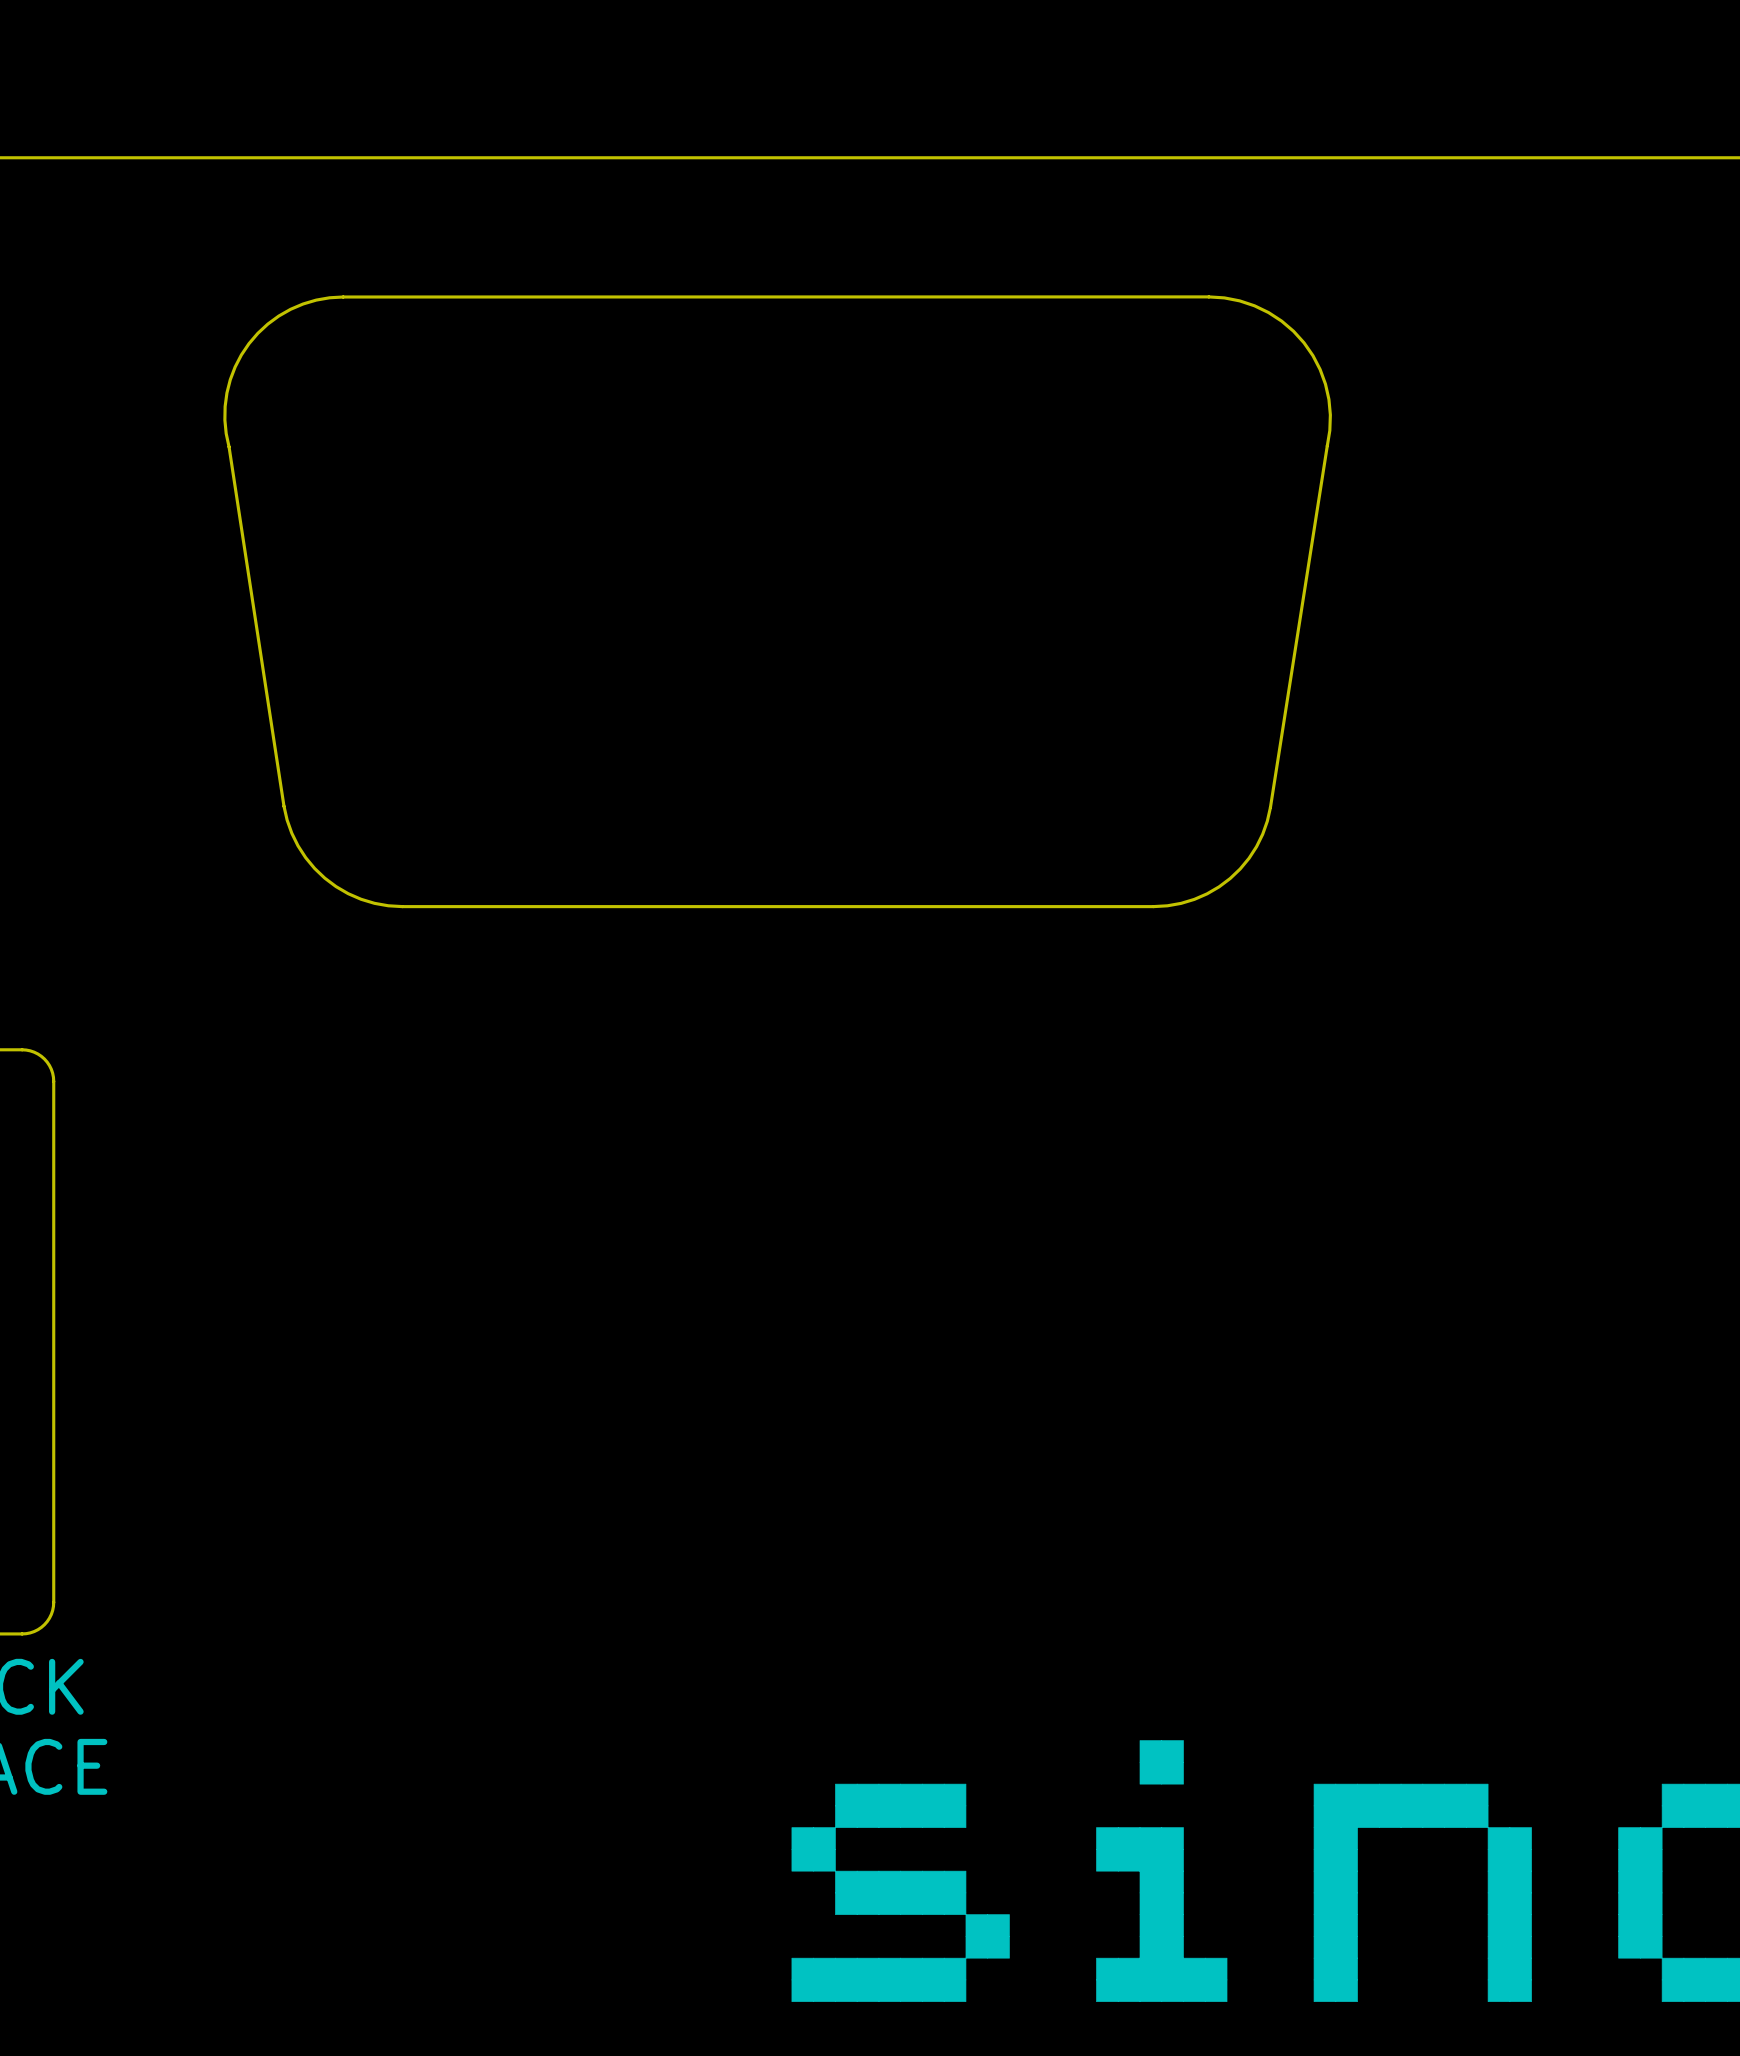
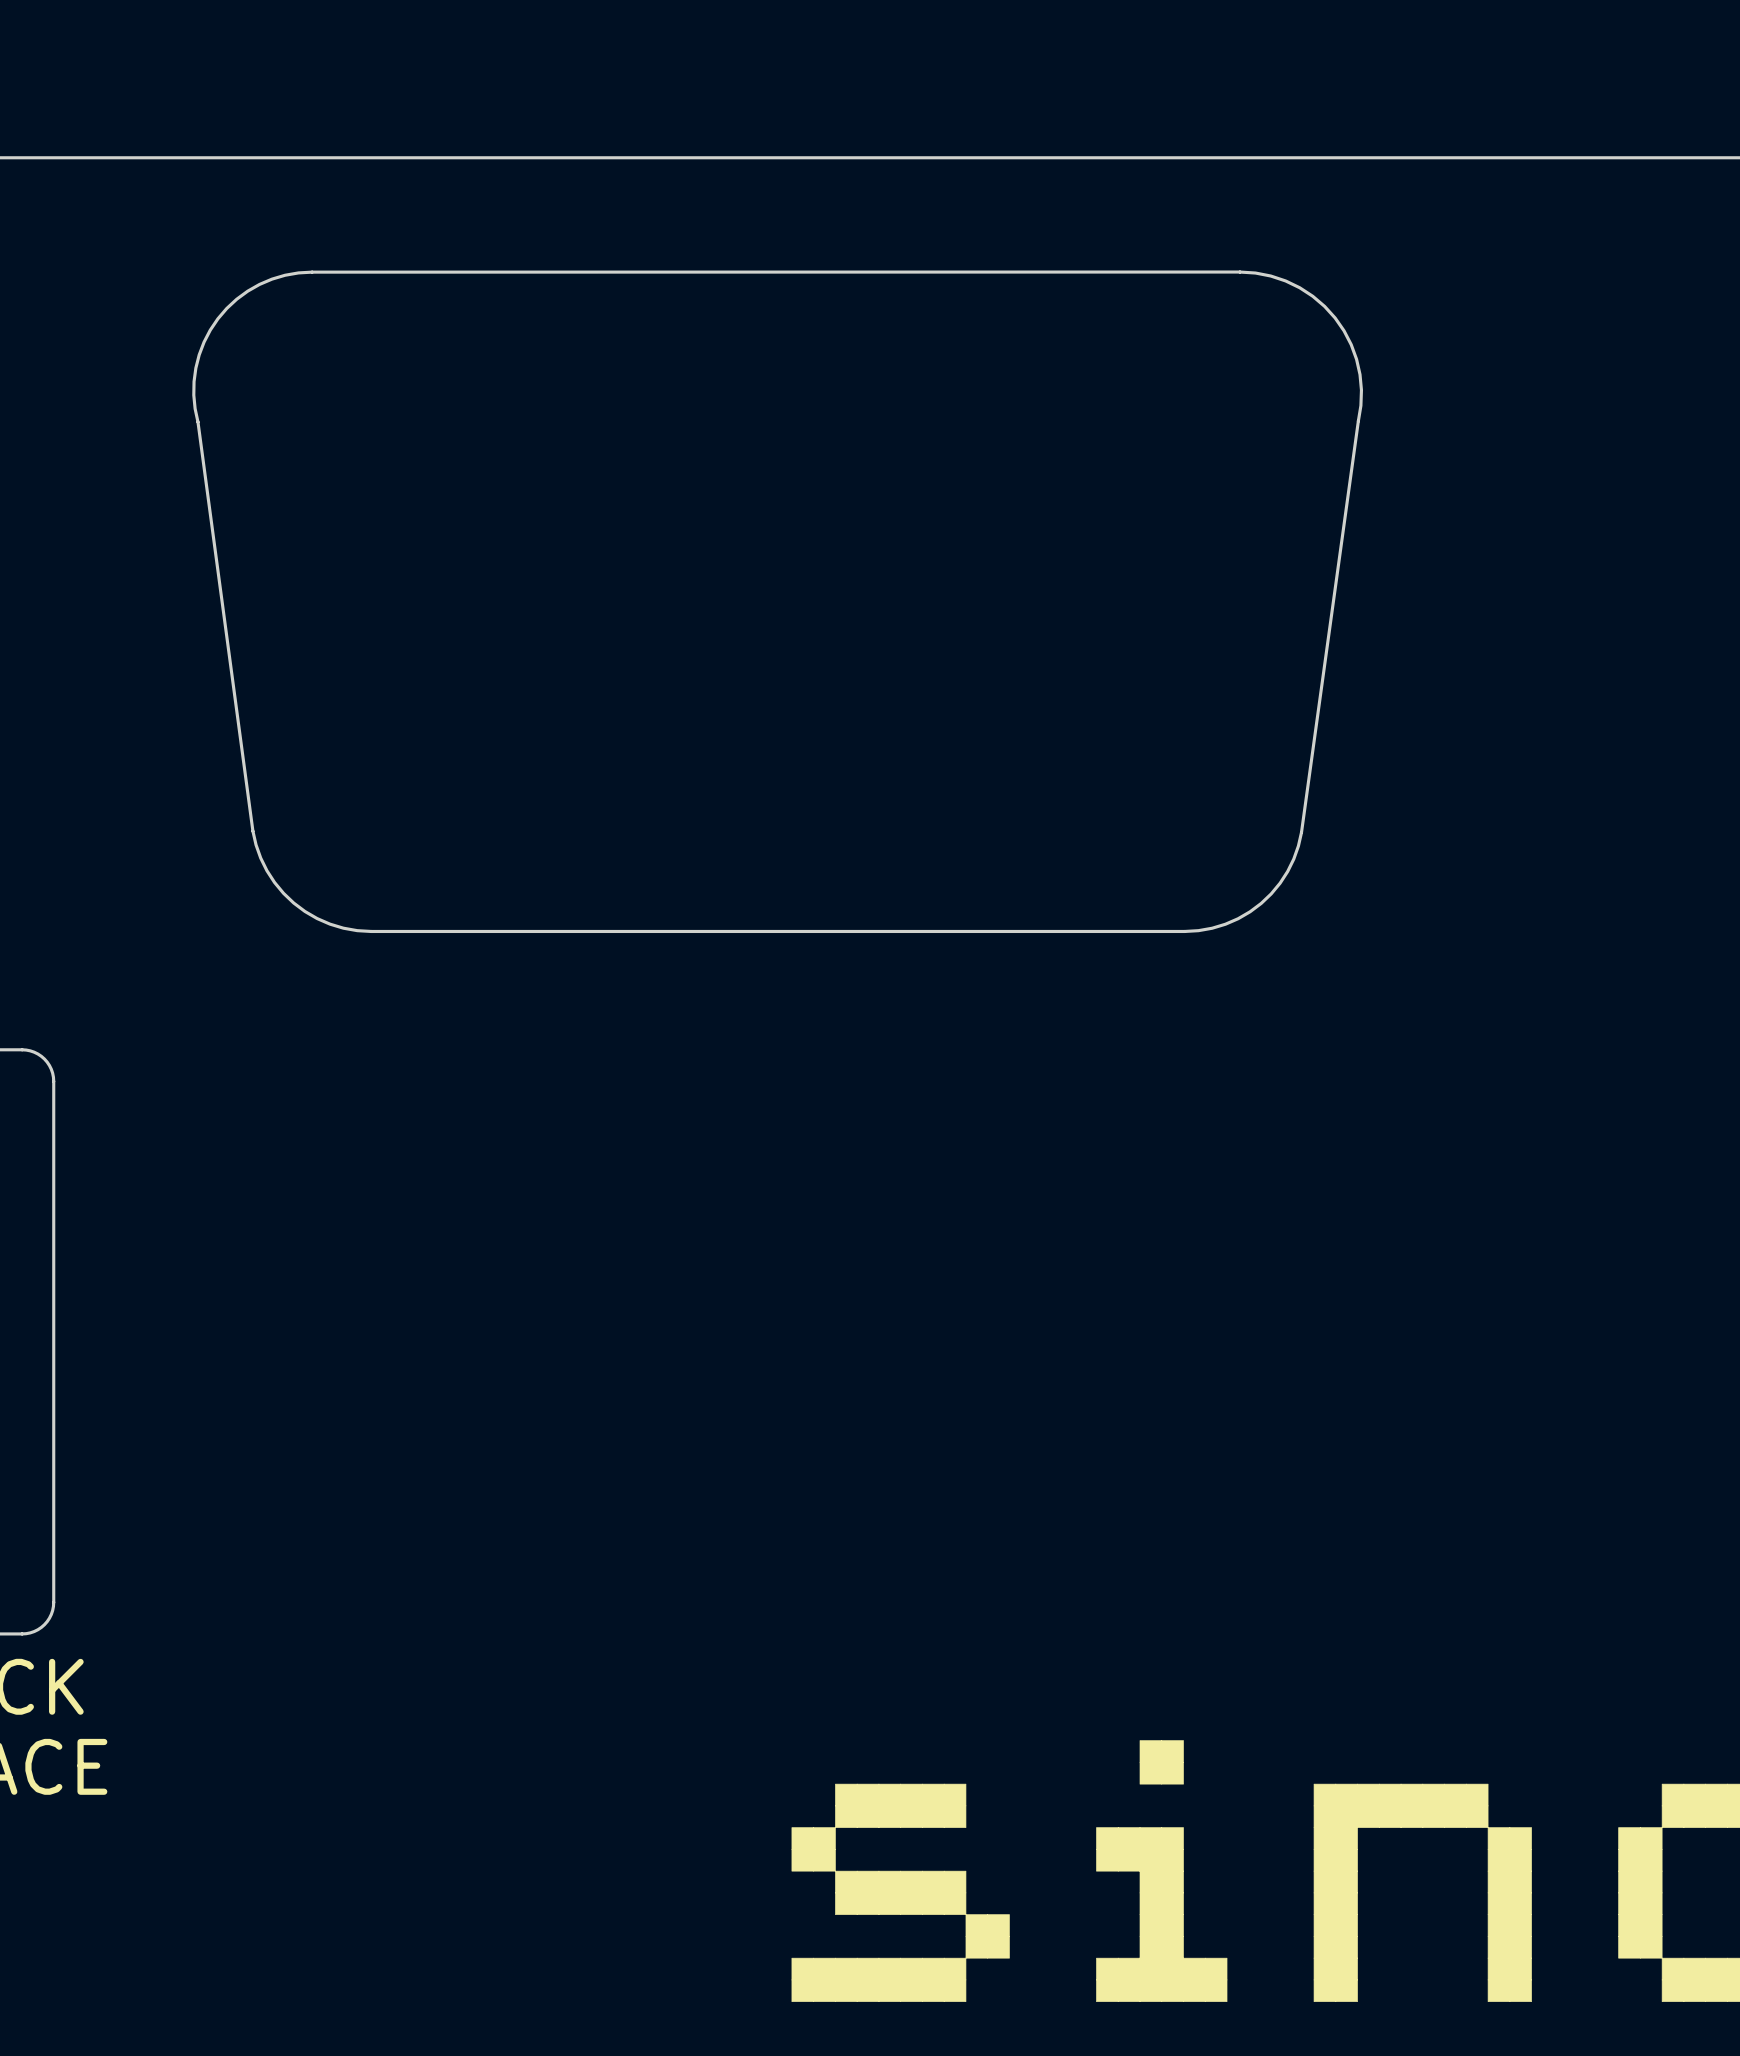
board edge: (343, 297) (1208, 296) (1239, 300) (1268, 312) (1293, 331) (1312, 355) (1325, 384) (1330, 414) (1329, 430) (1270, 807) (1267, 821) (1256, 846) (1240, 868) (1219, 886) (1194, 899) (1181, 903) (1153, 906) (402, 906) (374, 903) (348, 893) (336, 886) (324, 878) (305, 857) (298, 845) (287, 820) (224, 420) (226, 392) (230, 379) (241, 354) (257, 333) (278, 316) (290, 309) (316, 300) (343, 297) -> (1239, 272) (1255, 273) (1285, 280) (1299, 287) (1324, 306) (1344, 330) (1351, 344) (1356, 359) (1361, 390) (1360, 405) (1301, 832) (1293, 859) (1280, 883) (1261, 903) (1250, 911) (1225, 924) (1212, 928) (1184, 931) (371, 931) (357, 930) (330, 924) (304, 911) (283, 893) (266, 870) (256, 844) (252, 831) (193, 395) (195, 368) (204, 342) (210, 330) (226, 308) (247, 291) (259, 284) (285, 275) (312, 272) (1239, 272)

